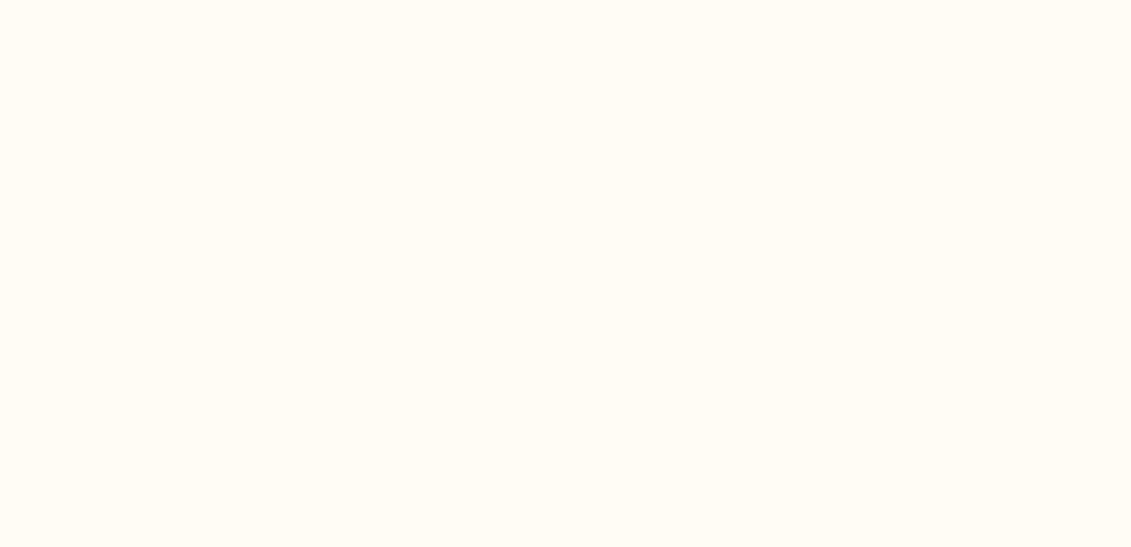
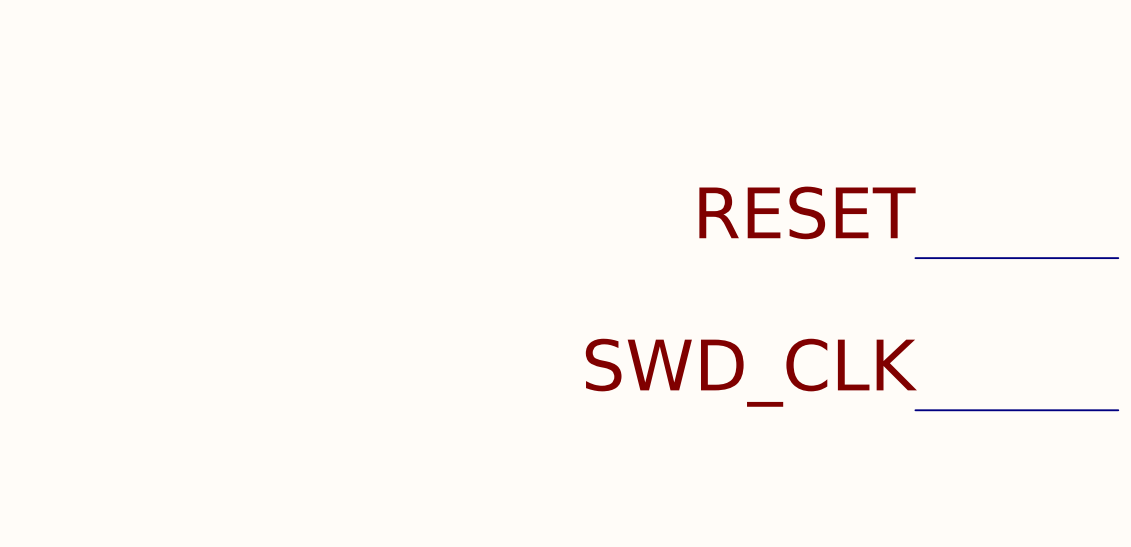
label: none -> RESET (807, 212)
wire: none -> (915, 258) (1118, 258)
label: none -> SWD_CLK (751, 372)
wire: none -> (915, 410) (1118, 410)

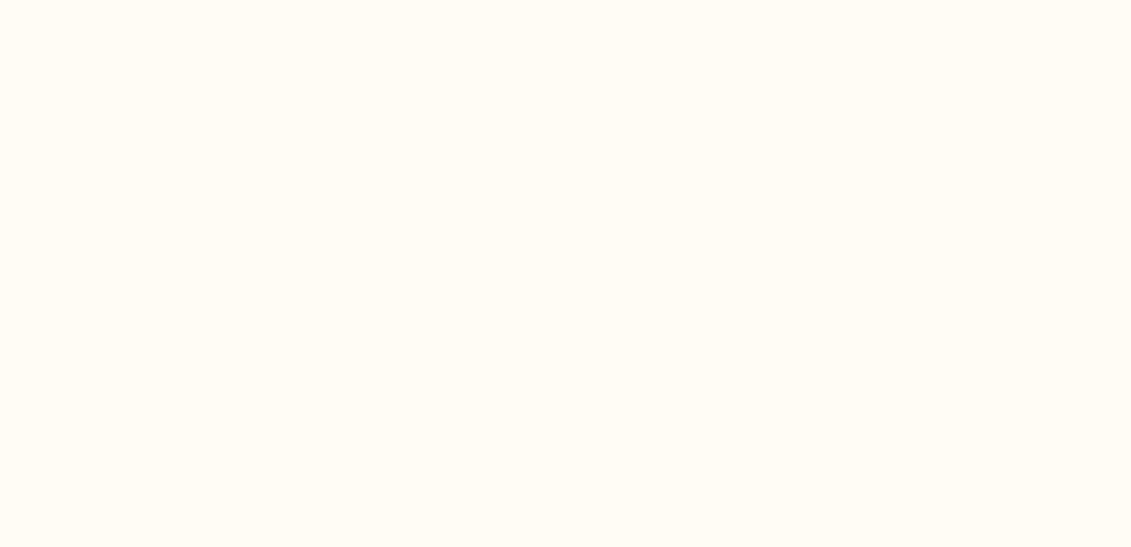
label: RESET (807, 212) -> none
wire: (915, 258) (1118, 258) -> none
label: SWD_CLK (751, 372) -> none
wire: (915, 410) (1118, 410) -> none

